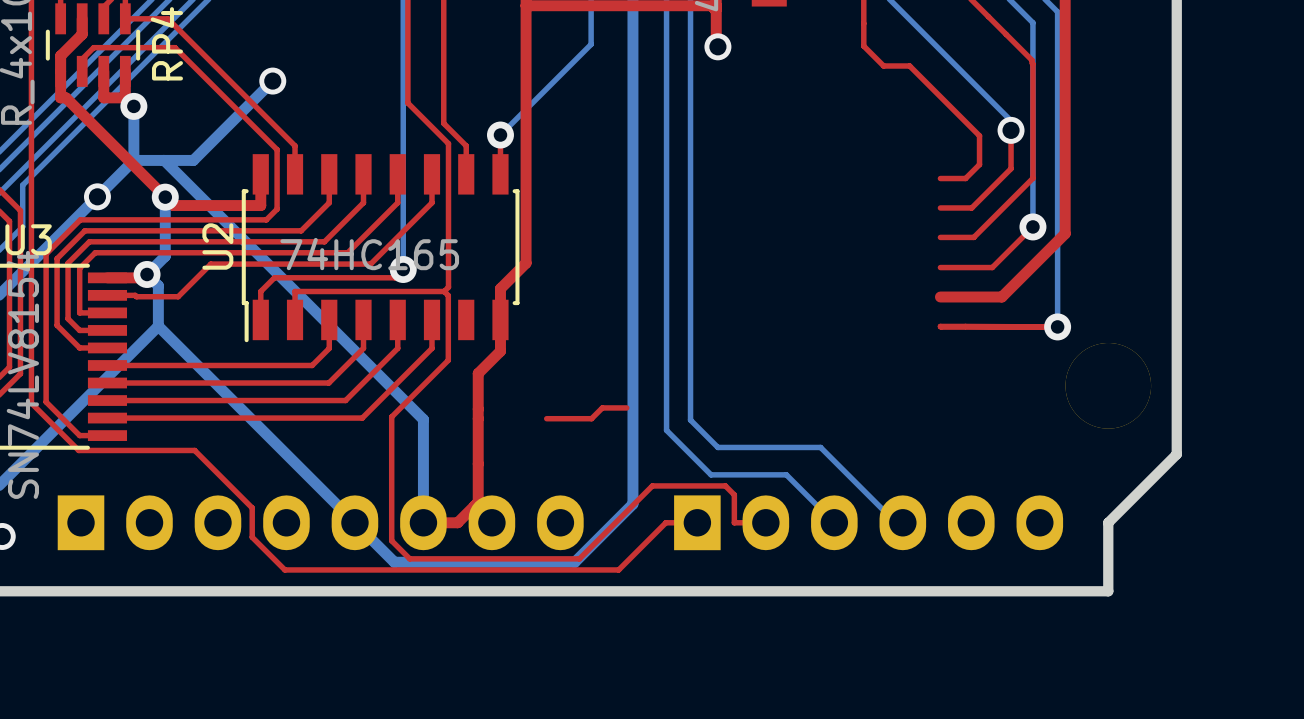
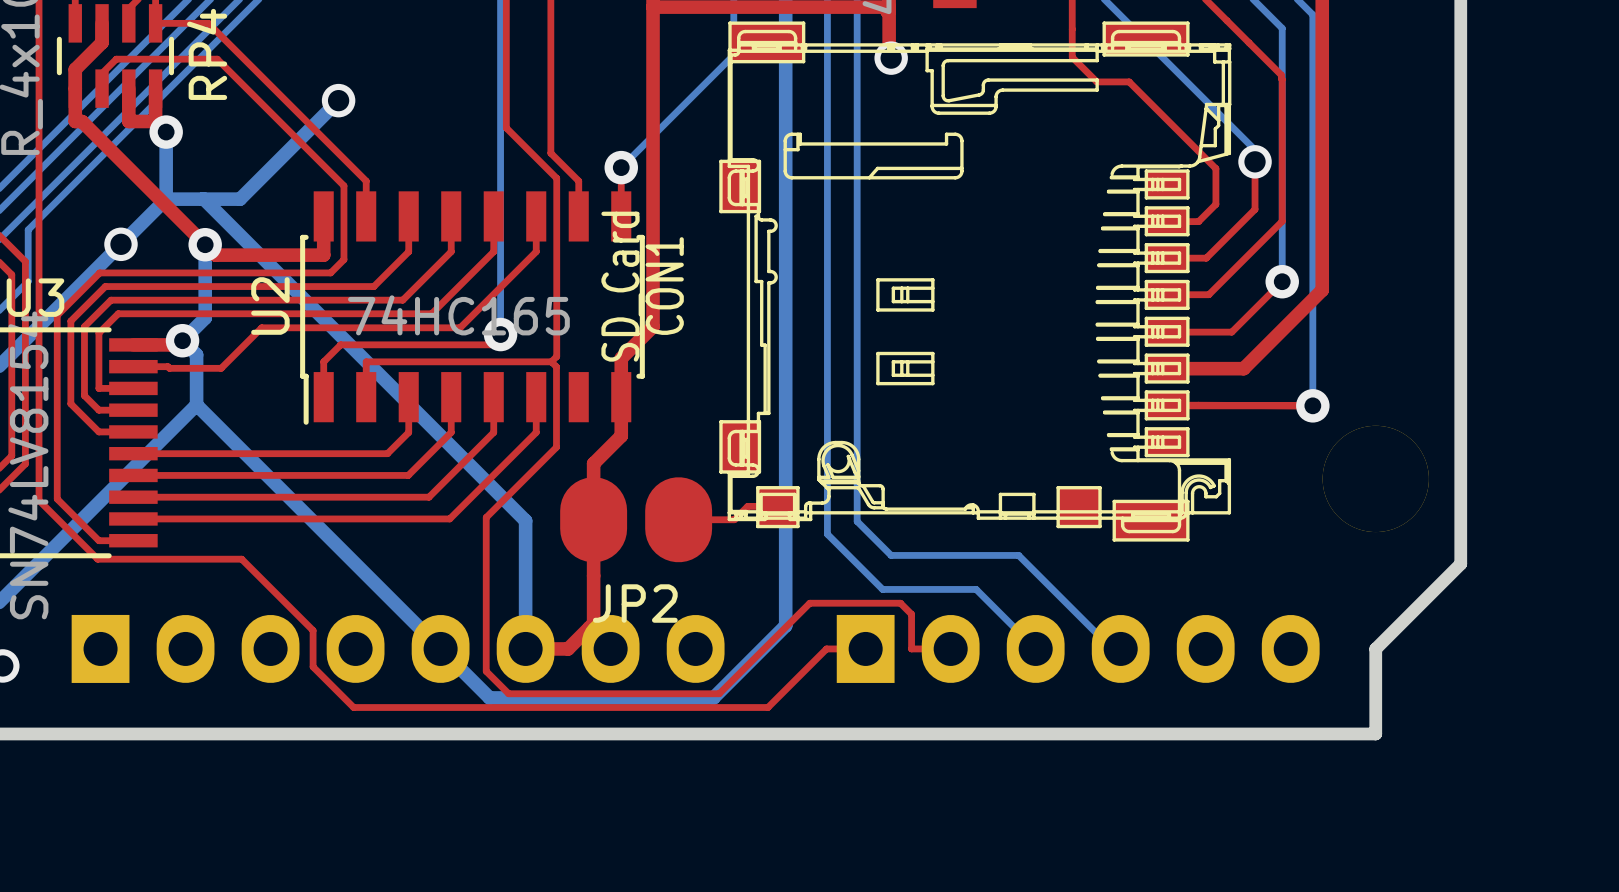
CON1: none -> SD_Card (975, 281)
JP2: none -> (636, 519)

